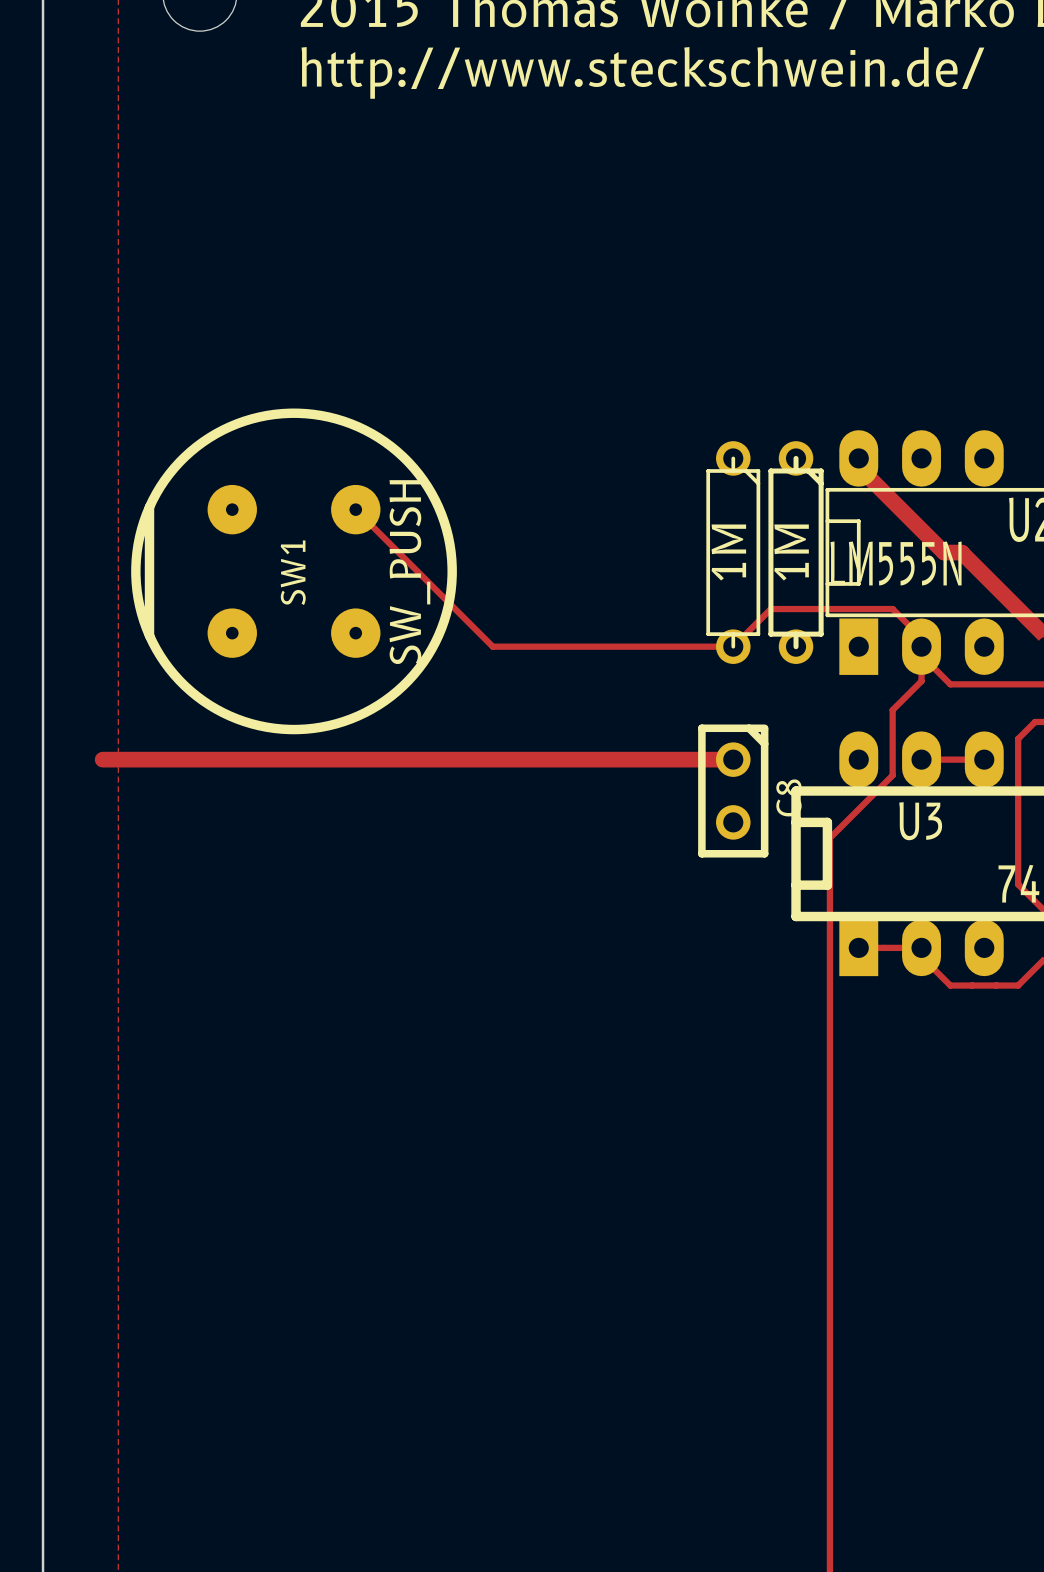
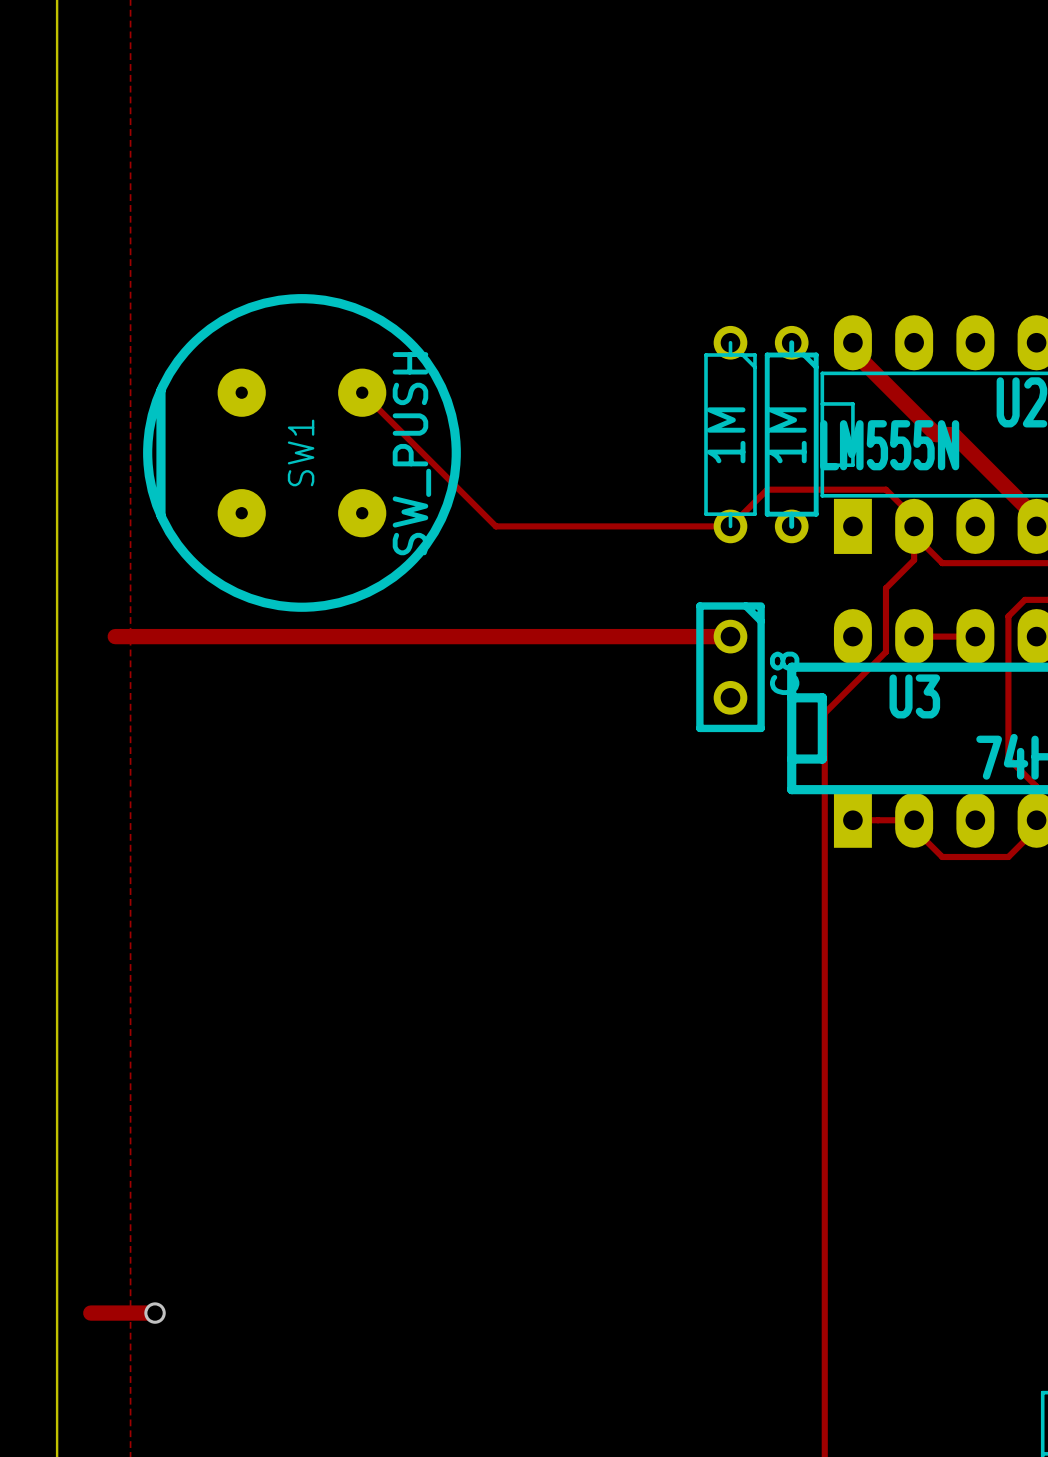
track: none -> (90, 1313) (155, 1313)
via: none -> (155, 1313)

